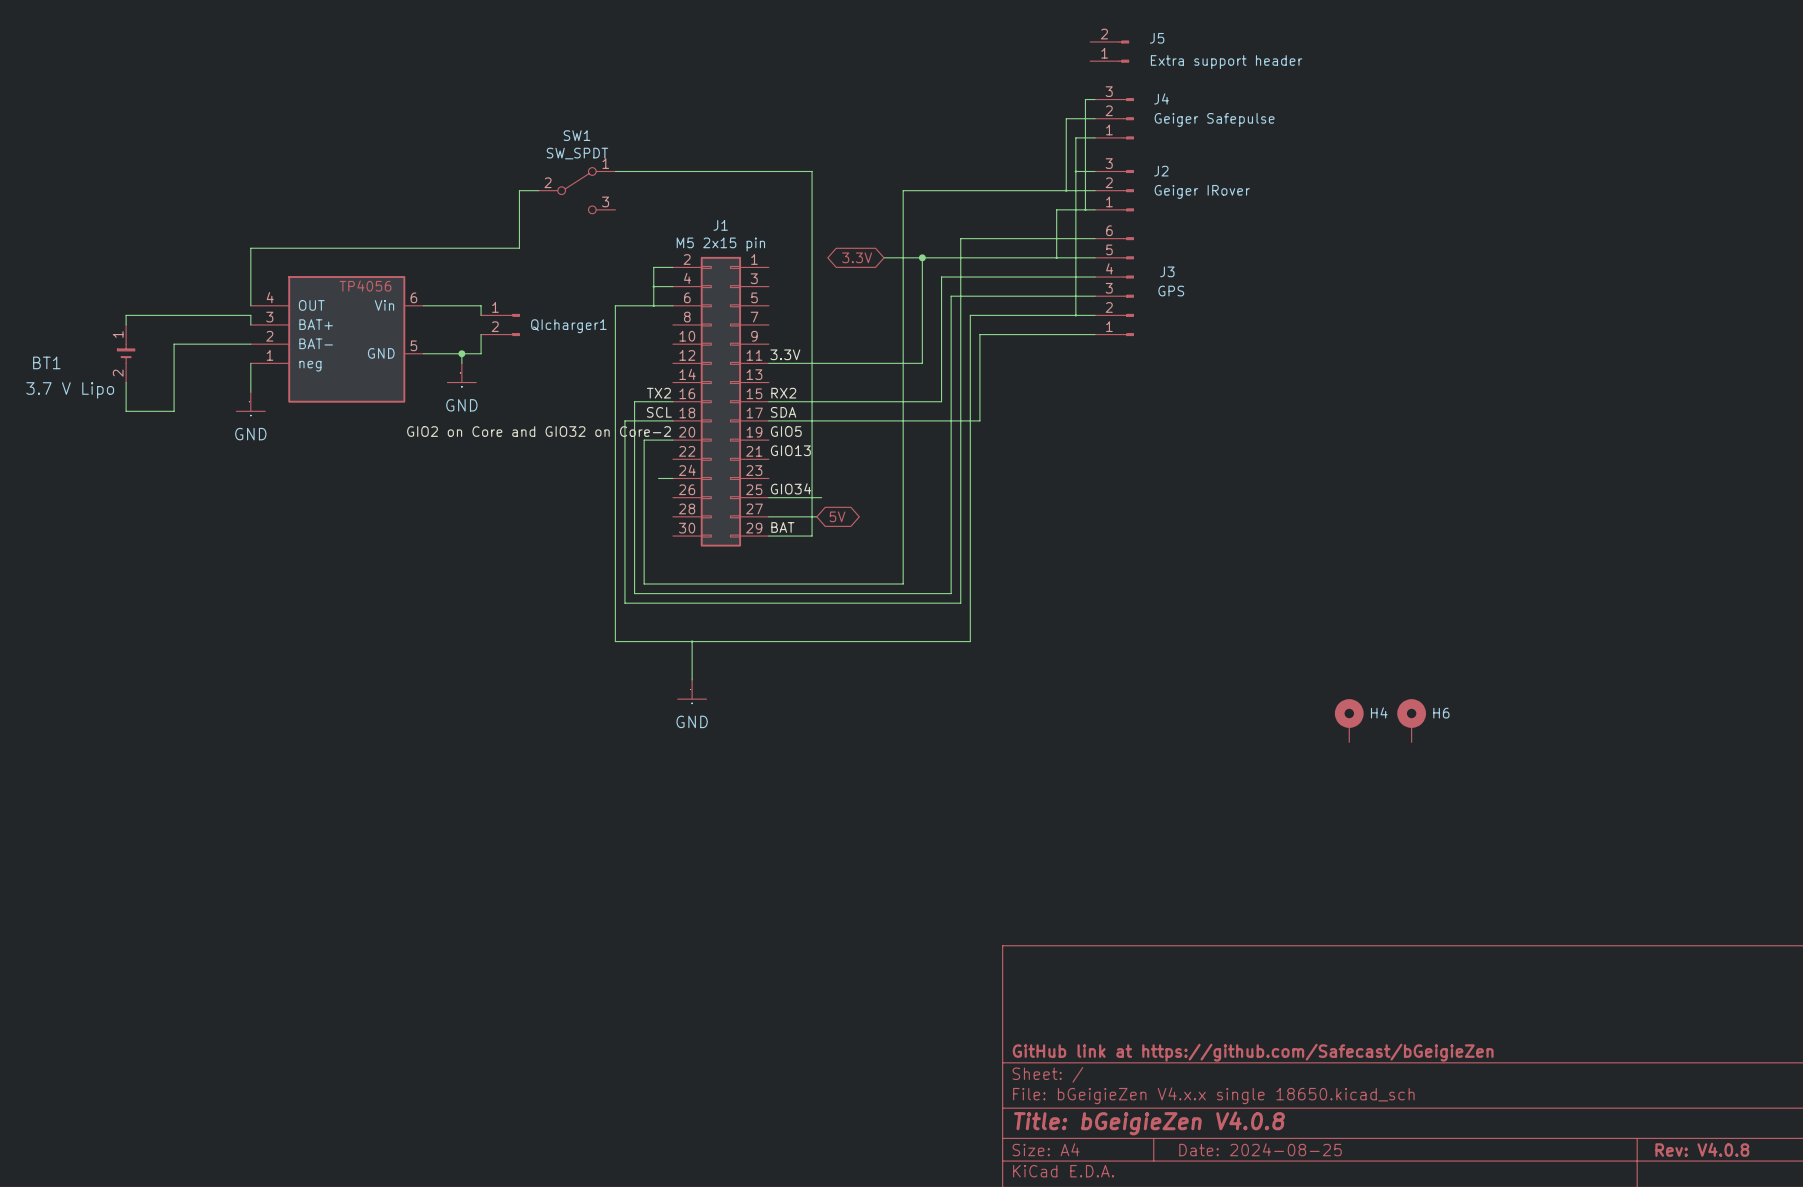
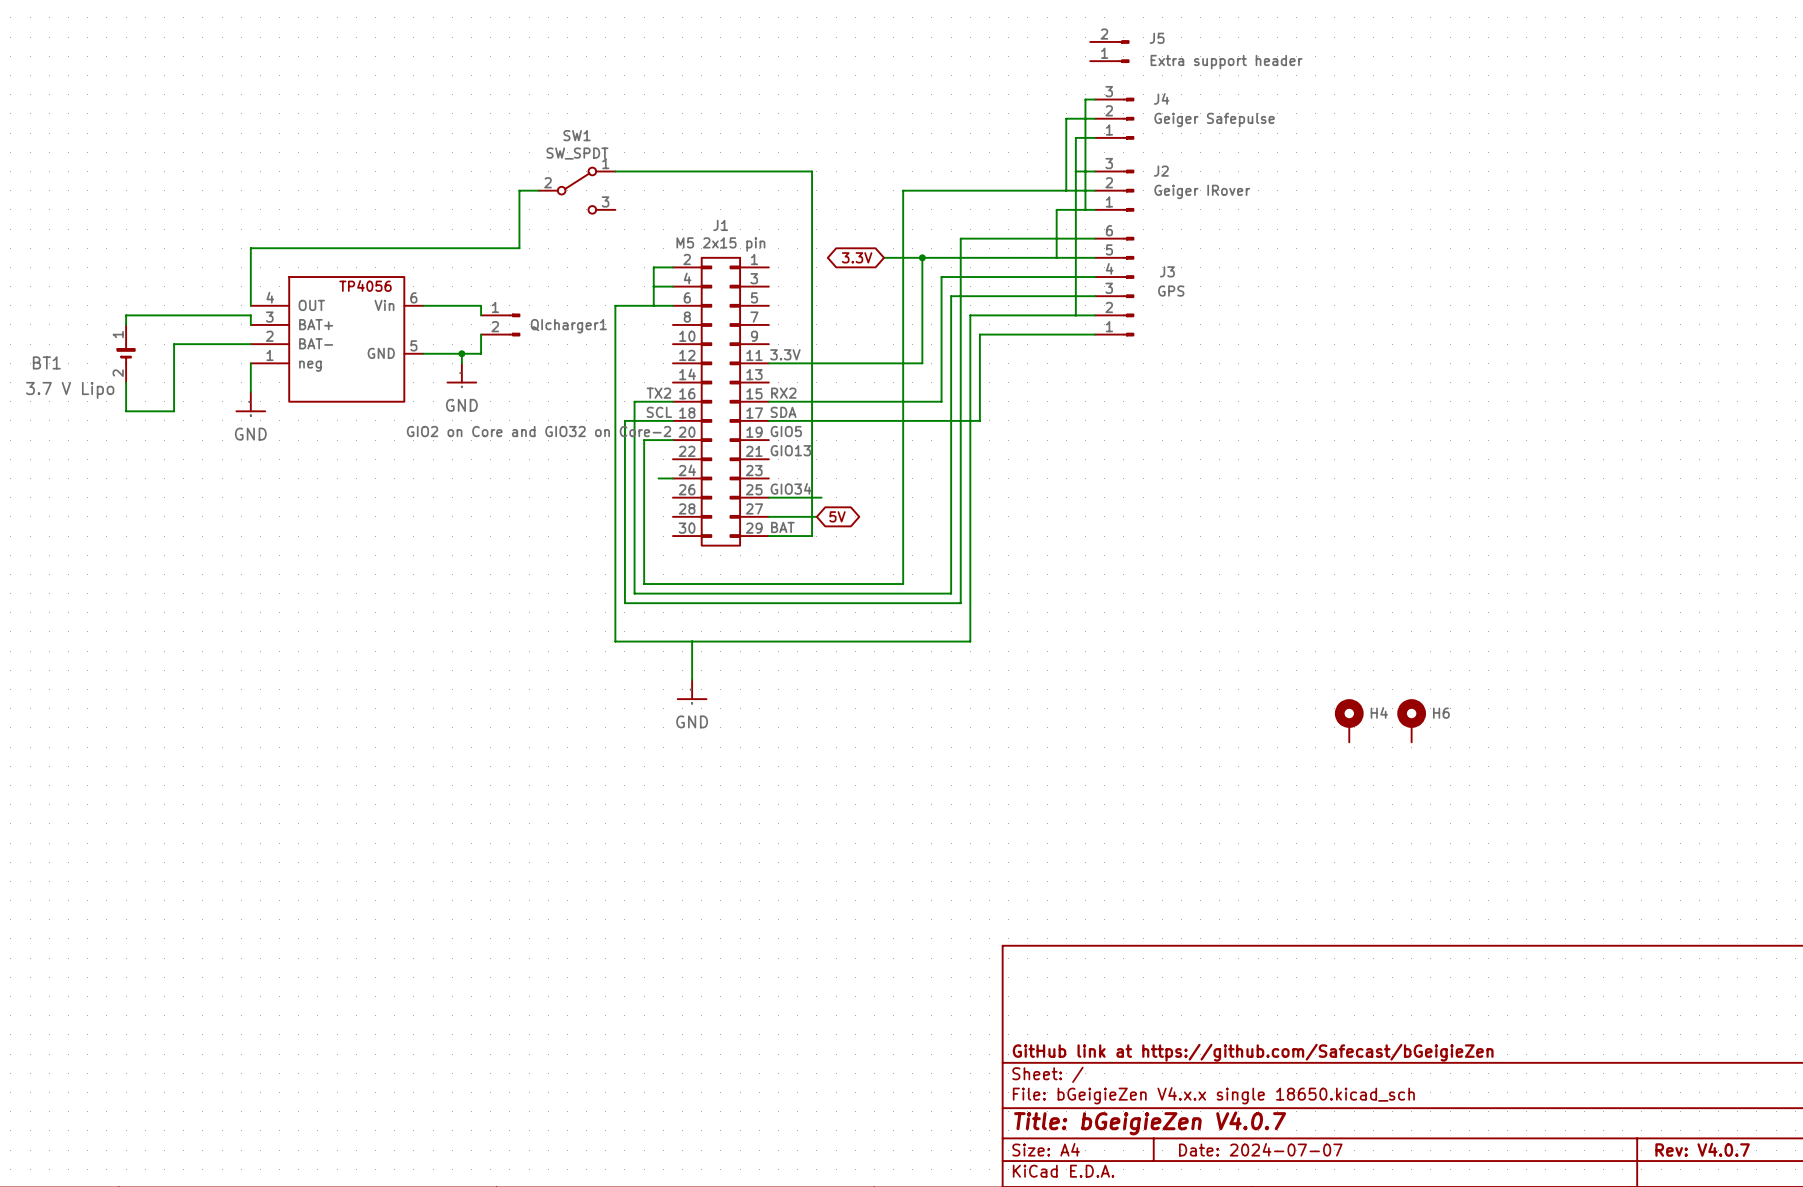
title block: Title: bGeigieZen V4.0.8 (1149, 1123) -> Title: bGeigieZen V4.0.7 (1150, 1123)
title block: Date: 2024-08-25 (1260, 1149) -> Date: 2024-07-07 (1260, 1149)
title block: Rev: V4.0.8 (1702, 1149) -> Rev: V4.0.7 (1702, 1149)

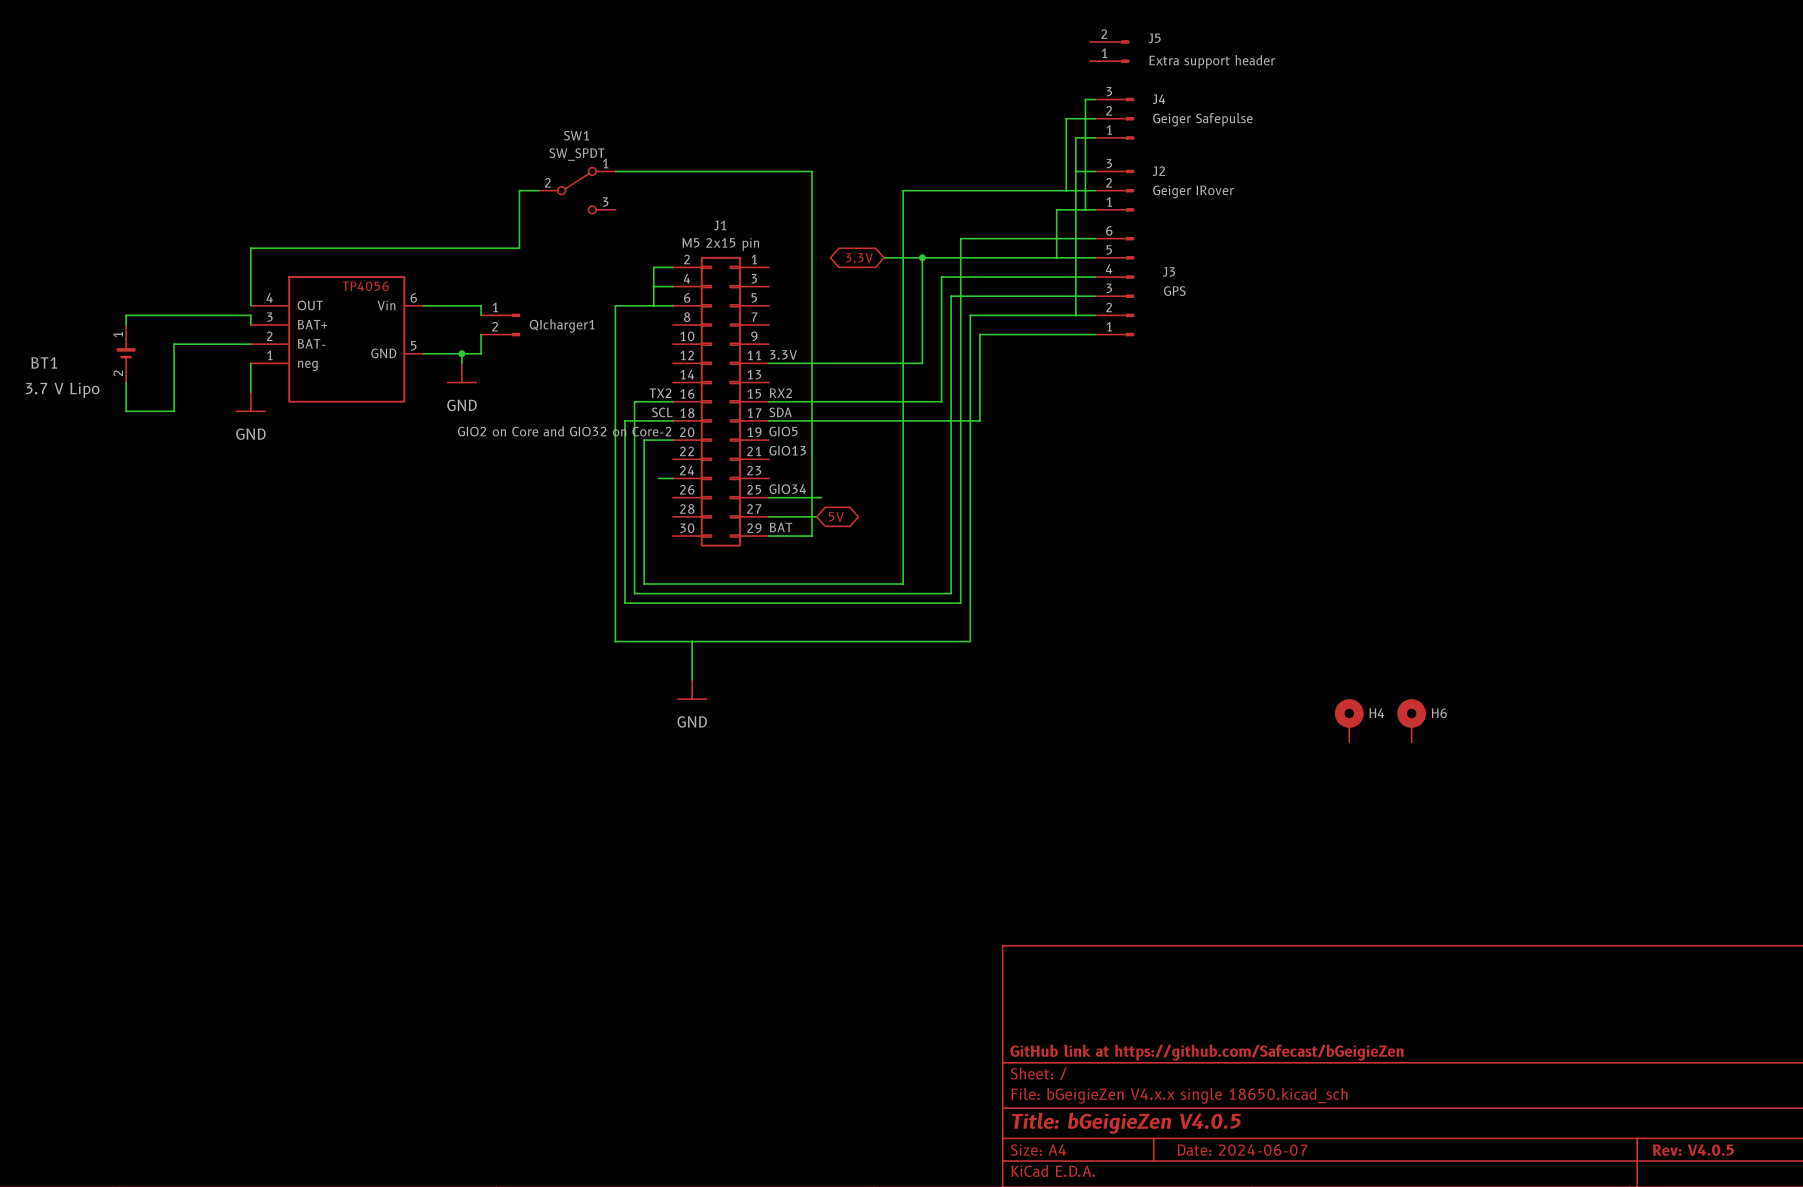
title block: Title: bGeigieZen V4.0.7 (1150, 1123) -> Title: bGeigieZen V4.0.5 (1126, 1123)
title block: Date: 2024-07-07 (1260, 1149) -> Date: 2024-06-07 (1242, 1150)
title block: Rev: V4.0.7 (1702, 1149) -> Rev: V4.0.5 (1693, 1150)

